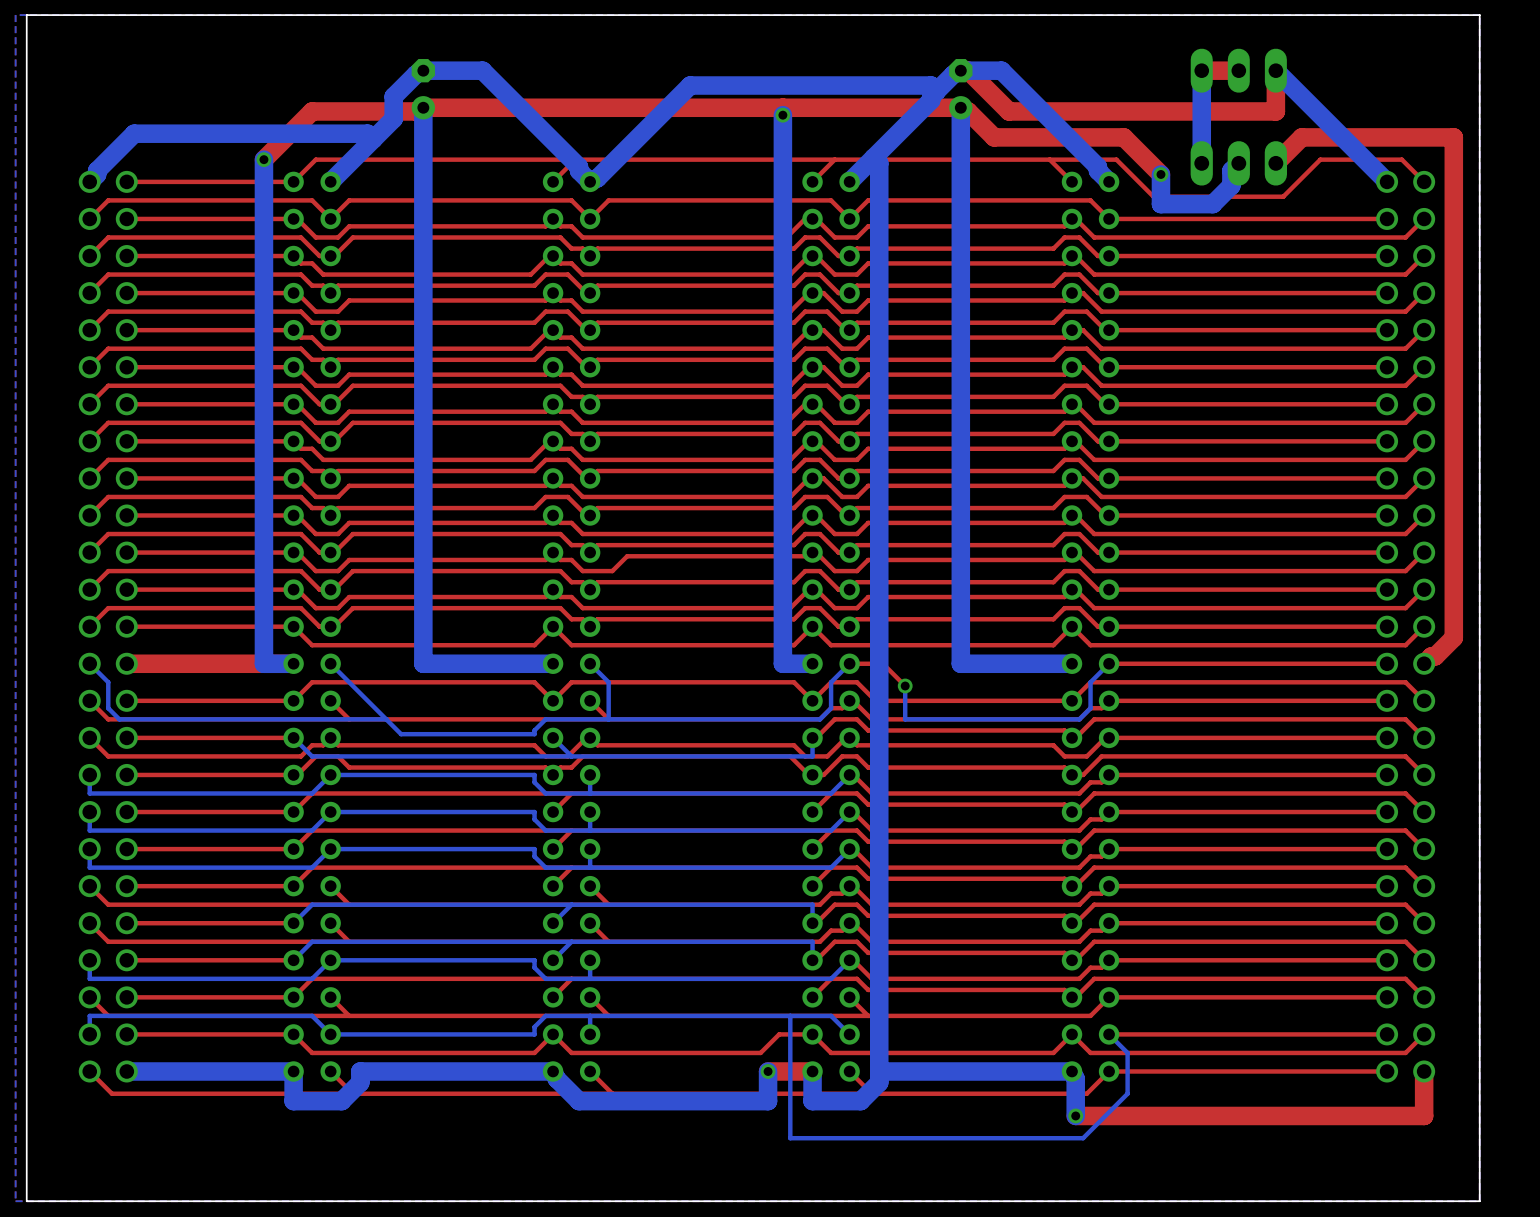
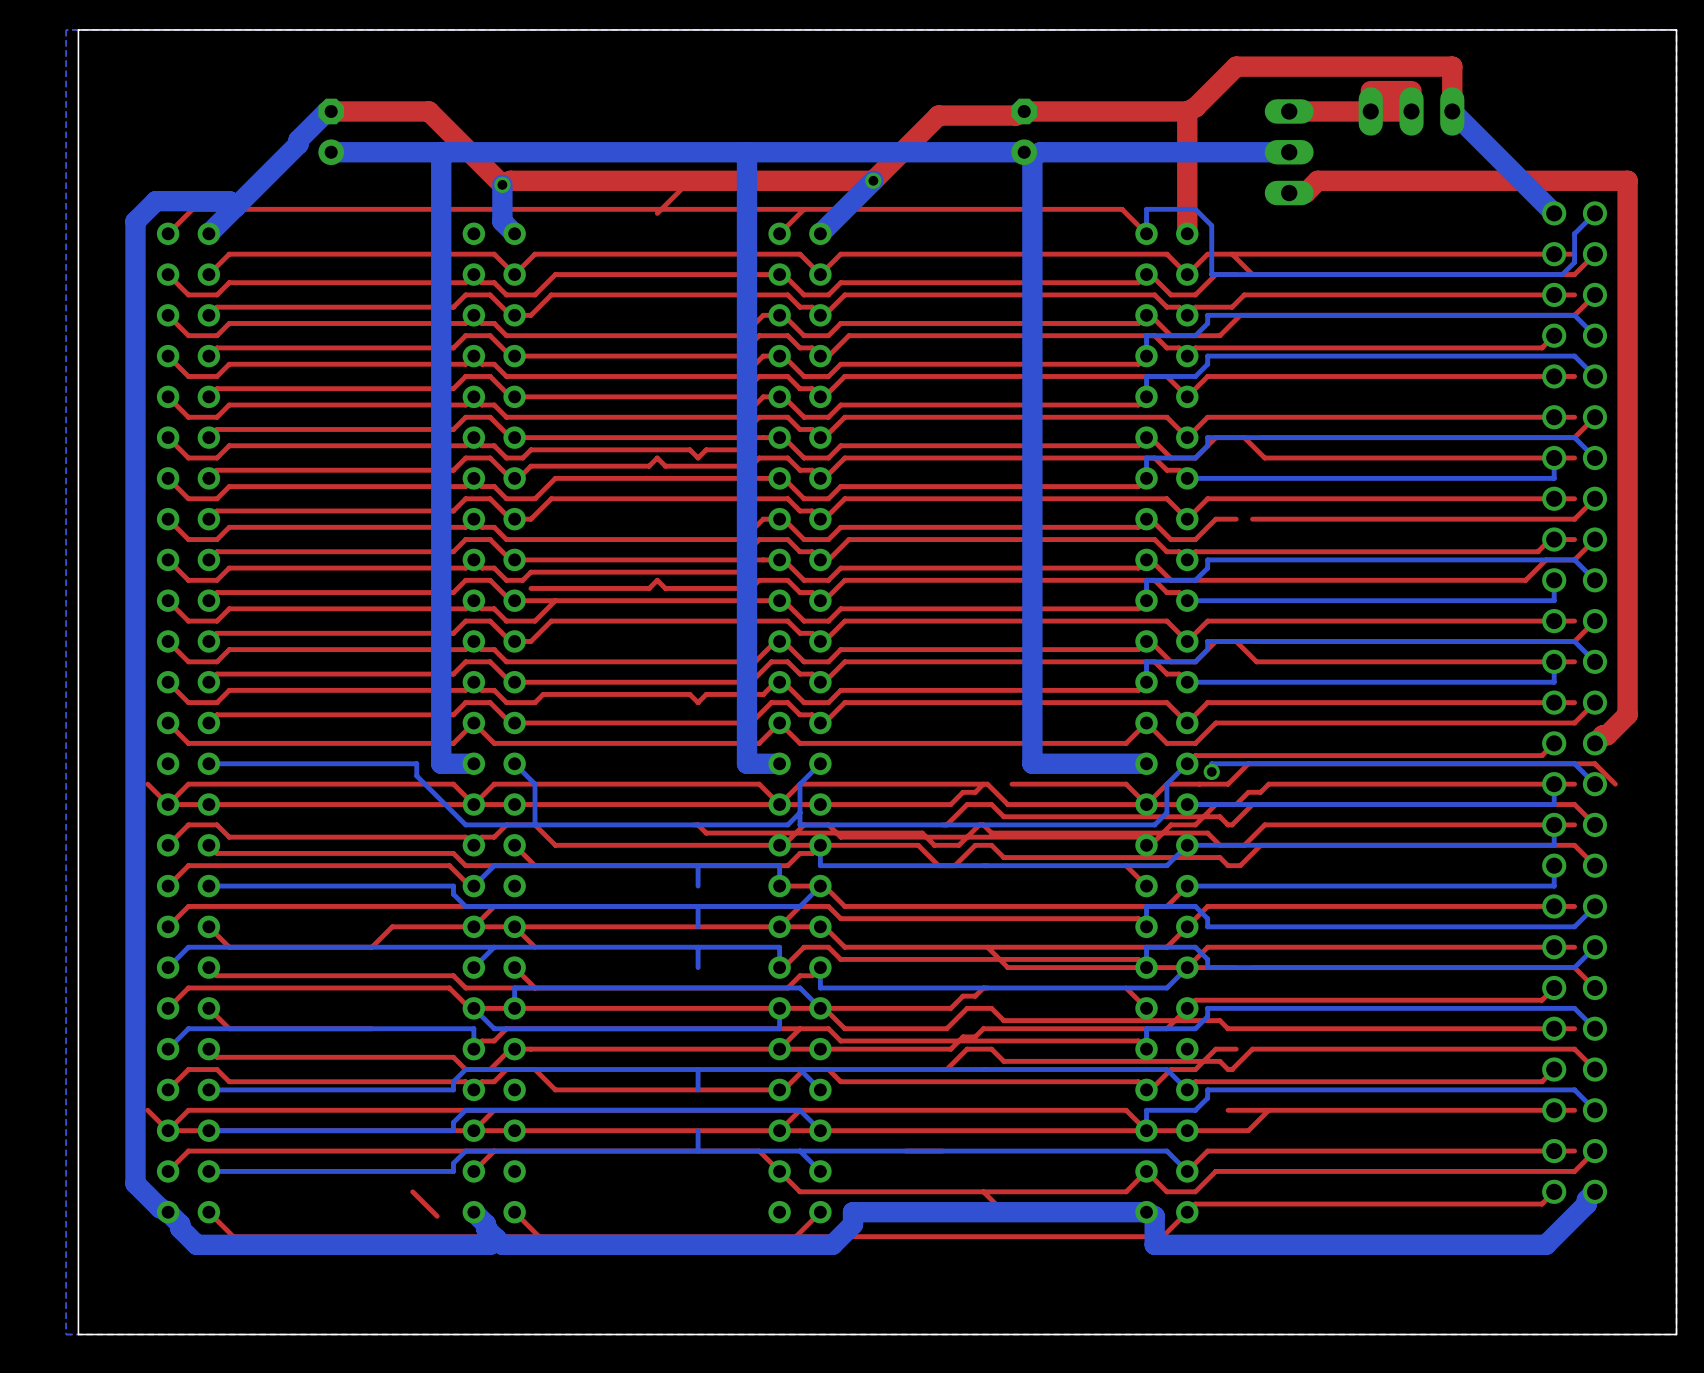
top track: (960, 70) (968, 70) (1009, 111) (1275, 111) (1275, 89) -> none
bottom track: (1201, 70) (1201, 163) -> none
part position: (1238, 70) -> (1411, 111)
top track: none -> (1452, 91) (1452, 66) (1236, 66) (1195, 107) (1187, 111)
bottom track: (1275, 70) (1387, 181) -> none
bottom track: none -> (331, 111) (327, 111) (298, 140) (298, 144) (208, 233)
part position: (423, 89) -> (331, 131)
part position: (960, 89) -> (1024, 131)
top track: none -> (1187, 111) (1024, 111) (1016, 115) (938, 115) (873, 180) (510, 180) (502, 184) (429, 111) (331, 111)
top track: none -> (1187, 111) (1187, 233)
top track: none -> (1411, 111) (1289, 111)
bottom track: none -> (1452, 111) (1554, 213)
bottom track: (936, 91) (931, 85) (690, 85) (597, 178) (590, 181) (579, 170) (579, 167) (482, 70) (423, 70) (415, 74) (393, 96) (393, 118) (330, 181) -> none
bottom track: (423, 107) (423, 663) (553, 663) -> none
bottom track: (960, 107) (960, 663) (1072, 663) -> none
bottom track: (782, 115) (782, 663) (812, 663) -> none
via position: (782, 115) -> (873, 180)
bottom track: none -> (331, 152) (1024, 152) (1032, 156)
bottom track: none -> (441, 152) (441, 763) (473, 763)
bottom track: none -> (747, 152) (747, 763) (779, 763)
bottom track: none -> (1289, 152) (1040, 152) (1032, 156)
bottom track: none -> (1032, 156) (1032, 763) (1146, 763)
bottom track: (373, 139) (367, 133) (134, 133) (97, 170) (97, 174) (89, 181) -> none
bottom track: none -> (873, 180) (820, 233)
bottom track: none -> (502, 184) (502, 221) (514, 233)
via: none -> (502, 184)
bottom track: (873, 157) (879, 163) (879, 1082) (860, 1101) (812, 1101) (812, 1071) -> none
top track: (263, 159) (312, 111) (415, 111) (423, 107) (960, 107) (968, 111) (994, 137) (1123, 137) (1160, 174) -> none
bottom track: (263, 159) (263, 663) (293, 663) -> none
via: (263, 159) -> none
top track: (834, 159) (812, 181) -> (804, 209) (779, 233)
top track: (1049, 159) (1072, 181) -> none
top track: none -> (1289, 193) (1305, 193) (1317, 180) (1627, 180) (1627, 714) (1607, 735) (1603, 735) (1594, 743)
bottom track: (1238, 163) (1231, 170) (1231, 185) (1212, 204) (1160, 204) (1160, 174) -> none
part rotation: 0° (1238, 163) -> 90° clockwise (1289, 152)
part position: (1238, 163) -> (1289, 152)
top track: (1275, 163) (1301, 137) (1453, 137) (1453, 637) (1435, 656) (1431, 656) (1424, 663) -> none
via: (1160, 174) -> none
bottom track: none -> (235, 207) (229, 201) (155, 201) (135, 221) (135, 1183) (159, 1208) (168, 1212) (180, 1224) (180, 1228) (196, 1244) (490, 1244) (496, 1238)
bottom track: (1109, 181) (1097, 170) (1097, 167) (1001, 70) (960, 70) (953, 74) (931, 96) (931, 100) (849, 181) -> none
bottom track: none -> (1594, 213) (1574, 233) (1574, 262) (1562, 274) (1211, 274) (1211, 225) (1195, 209) (1146, 209) (1146, 233)
top track: (1424, 181) (1401, 159) (1320, 159) (1283, 196) (1153, 196) (1116, 159) (315, 159) (293, 181) (126, 181) -> none
top track: none -> (1146, 233) (1122, 209) (192, 209) (168, 233)
top track: (163, 218) (126, 218) -> (229, 254) (208, 274)
top track: (297, 218) (315, 237) (338, 237) (349, 226) (545, 226) (553, 218) (560, 226) (571, 226) (582, 237) -> (376, 254) (494, 254) (514, 274) (535, 254) (800, 254) (820, 274) (840, 254) (934, 254)
top track: (805, 218) (786, 237) (667, 237) -> (1219, 274) (1215, 274) (1195, 294) (1170, 294) (1150, 274) (1146, 274) (1138, 282) (840, 282) (828, 294) (804, 294) (783, 274)
top track: (1072, 218) (1064, 226) (868, 226) (857, 237) (834, 237) (816, 218) -> (1228, 254) (1207, 254) (1187, 274) (1166, 254) (946, 254)
top track: (1109, 218) (1090, 200) (868, 200) (849, 218) (831, 200) (608, 200) (590, 218) (571, 200) (349, 200) (330, 218) (312, 200) (108, 200) (89, 218) -> (1268, 254) (1232, 254)
top track: (1424, 218) (1405, 237) (1387, 237) -> (1594, 254) (1574, 274)
top track: none -> (168, 274) (188, 294)
top track: (460, 237) (352, 237) (334, 256) (319, 256) (301, 237) (108, 237) (89, 256) -> (555, 274) (535, 294) (506, 294) (494, 282) (482, 282) (473, 274) (465, 282) (229, 282) (217, 294)
top track: (560, 237) (571, 248) (582, 248) (590, 256) (597, 248) (794, 248) (805, 237) (819, 237) (838, 256) -> (946, 294) (971, 294)
top track: none -> (689, 274) (665, 274)
top track: (1064, 237) (1053, 248) (857, 248) (849, 256) -> (1256, 294) (1244, 294) (1232, 307) (1195, 307) (1187, 315) (1179, 307) (1166, 307) (1154, 294) (983, 294)
top track: (1079, 237) (1097, 256) -> none
top track: (152, 256) (293, 256) (301, 263) (312, 263) (323, 274) (419, 274) -> (208, 315) (217, 307) (453, 307) (465, 294) (490, 294) (510, 315)
top track: (549, 256) (530, 274) (438, 274) -> (653, 294) (551, 294) (530, 315)
top track: (553, 256) (560, 263) (571, 263) (582, 274) (649, 274) -> (657, 294) (787, 294) (800, 307) (812, 307) (820, 315)
top track: (808, 256) (790, 274) (705, 274) -> (938, 294) (844, 294) (824, 315)
top track: (816, 256) (834, 274) (857, 274) (868, 263) (1064, 263) (1072, 256) (1075, 256) (1094, 274) -> (783, 315) (804, 335) (828, 335) (840, 323) (1138, 323) (1146, 315) (1150, 315) (1170, 335) (1219, 335) (1240, 315) (1252, 315)
top track: (1424, 256) (1405, 274) (1387, 274) -> (1594, 294) (1574, 315)
top track: none -> (168, 315) (188, 335)
top track: (701, 274) (667, 274) -> none
top track: (152, 293) (297, 293) (315, 311) (338, 311) (349, 300) (545, 300) (553, 293) (560, 300) (571, 300) (582, 311) -> (217, 335) (229, 323) (465, 323) (473, 315) (482, 323) (494, 323) (506, 335) (694, 335)
top track: (586, 293) (567, 274) (545, 274) (534, 285) (338, 285) (330, 293) (323, 285) (312, 285) (301, 274) (108, 274) (89, 293) -> none
top track: (808, 293) (790, 311) (708, 311) -> (938, 335) (848, 335) (828, 356)
top track: (838, 293) (819, 274) (805, 274) (794, 285) (597, 285) (590, 293) -> (763, 315) (742, 335) (698, 335)
top track: (1387, 293) (1097, 293) (1079, 274) (1064, 274) (1053, 285) (857, 285) (849, 293) -> (1554, 335) (1541, 347) (1195, 347) (1187, 356) (1179, 347) (1166, 347) (1154, 335) (983, 335)
bottom track: none -> (1594, 335) (1574, 315) (1207, 315) (1207, 323) (1195, 335) (1146, 335) (1146, 356)
top track: (1424, 293) (1405, 311) (1101, 311) (1083, 293) (1072, 293) (1064, 300) (868, 300) (857, 311) (842, 311) (823, 293) -> (971, 335) (954, 335)
top track: none -> (168, 356) (188, 376)
top track: (545, 311) (534, 322) (338, 322) (330, 330) (323, 322) (312, 322) (301, 311) (108, 311) (89, 330) -> (649, 356) (510, 356) (490, 335) (465, 335) (453, 347) (217, 347) (208, 356)
top track: (567, 311) (586, 330) -> (673, 356) (689, 356)
top track: (649, 311) (627, 311) -> (763, 356) (742, 376) (698, 376)
top track: (701, 311) (667, 311) -> (820, 356) (812, 347) (800, 347) (787, 335) (759, 335) (738, 356)
top track: none -> (1146, 356) (1138, 364) (840, 364) (828, 376) (804, 376) (783, 356)
top track: (152, 330) (293, 330) (301, 337) (312, 337) (323, 348) (419, 348) -> (208, 396) (217, 388) (453, 388) (465, 376) (490, 376) (510, 396)
top track: (549, 330) (530, 348) -> (649, 396) (632, 396)
top track: none -> (653, 376) (506, 376) (494, 364) (482, 364) (473, 356) (465, 364) (229, 364) (217, 376)
top track: (553, 330) (560, 337) (571, 337) (582, 348) -> (657, 376) (694, 376)
top track: (808, 330) (790, 348) (705, 348) -> (938, 376) (844, 376) (824, 396)
top track: (845, 330) (827, 311) (805, 311) (794, 322) (597, 322) (590, 330) -> (979, 376) (954, 376)
top track: (1072, 330) (1064, 337) (868, 337) (857, 348) (842, 348) (823, 330) -> (1228, 376) (1207, 376) (1187, 396) (1166, 376) (983, 376)
top track: (1105, 330) (1086, 311) (1064, 311) (1053, 322) (857, 322) (849, 330) -> (1264, 376) (1240, 376)
bottom track: none -> (1594, 376) (1574, 356) (1207, 356) (1207, 364) (1195, 376) (1146, 376) (1146, 396)
top track: (1424, 330) (1405, 348) (1101, 348) (1083, 330) -> none
top track: none -> (168, 396) (188, 417)
top track: (545, 348) (534, 359) (338, 359) (330, 367) (323, 359) (312, 359) (301, 348) (108, 348) (89, 367) -> none
top track: (567, 348) (586, 367) -> (673, 396) (689, 396)
top track: (649, 348) (627, 348) -> (763, 396) (742, 417) (698, 417)
top track: (701, 348) (667, 348) -> (820, 396) (812, 388) (800, 388) (787, 376) (759, 376) (738, 396)
top track: none -> (1146, 396) (1138, 405) (840, 405) (828, 417) (804, 417) (783, 396)
top track: (152, 367) (297, 367) (315, 385) (338, 385) (349, 374) (545, 374) (553, 367) (560, 374) (571, 374) (582, 385) -> (217, 417) (229, 405) (465, 405) (473, 396) (482, 405) (494, 405) (506, 417) (694, 417)
top track: (808, 367) (790, 385) (705, 385) -> (938, 417) (844, 417) (824, 437)
top track: (845, 367) (827, 348) (805, 348) (794, 359) (597, 359) (590, 367) -> (979, 417) (954, 417)
top track: (1072, 367) (1064, 374) (868, 374) (857, 385) (842, 385) (823, 367) -> (1228, 417) (1207, 417) (1187, 437) (1166, 417) (983, 417)
top track: (1083, 367) (1101, 385) -> (1240, 417) (1264, 417)
top track: (1105, 367) (1086, 348) (1064, 348) (1053, 359) (857, 359) (849, 367) -> none
top track: (1424, 367) (1405, 385) (1387, 385) -> (1594, 417) (1574, 437)
top track: none -> (168, 437) (188, 458)
top track: (419, 385) (352, 385) (334, 404) (319, 404) (301, 385) (108, 385) (89, 404) -> (510, 437) (490, 417) (465, 417) (453, 429) (217, 429) (208, 437)
top track: (560, 385) (571, 396) -> (665, 437) (689, 437)
top track: (701, 385) (667, 385) -> (820, 437) (812, 429) (800, 429) (787, 417) (759, 417) (738, 437)
top track: (1064, 385) (1053, 396) (857, 396) (849, 404) -> (1187, 478) (1179, 470) (1166, 470) (1154, 458) (983, 458)
top track: none -> (1219, 437) (1215, 437) (1195, 458) (1170, 458) (1150, 437) (1146, 437) (1138, 445) (840, 445) (828, 458) (804, 458) (783, 437)
top track: (638, 396) (794, 396) (805, 385) (827, 385) (845, 404) -> (946, 458) (979, 458)
top track: (152, 404) (297, 404) (315, 422) (338, 422) (349, 411) (438, 411) -> (217, 458) (229, 445) (465, 445) (473, 437) (482, 445) (494, 445) (506, 458) (522, 458) (530, 449) (677, 449)
top track: (805, 404) (786, 422) (705, 422) -> (934, 458) (844, 458) (824, 478)
bottom track: none -> (1554, 458) (1554, 478) (1187, 478)
bottom track: none -> (1594, 458) (1574, 437) (1207, 437) (1207, 445) (1195, 458) (1146, 458) (1146, 478)
top track: (1424, 404) (1405, 422) (1094, 422) (1075, 404) (1072, 404) (1064, 411) (868, 411) (857, 422) (834, 422) (816, 404) -> none
top track: (571, 411) (582, 422) -> (665, 478) (689, 478)
top track: (419, 422) (352, 422) (334, 441) (319, 441) (301, 422) (108, 422) (89, 441) -> (510, 478) (490, 458) (465, 458) (453, 470) (217, 470) (208, 478)
top track: (460, 422) (427, 422) -> (530, 466) (518, 478)
top track: none -> (555, 478) (535, 498) (506, 498) (494, 486) (482, 486) (473, 478) (465, 486) (229, 486) (217, 498)
top track: (560, 422) (571, 433) (582, 433) (590, 441) (597, 433) (794, 433) (805, 422) (819, 422) (838, 441) -> none
top track: (701, 422) (667, 422) -> (820, 478) (812, 470) (800, 470) (787, 458) (759, 458) (751, 466) (677, 466)
top track: none -> (1146, 478) (1138, 486) (840, 486) (828, 498) (804, 498) (783, 478)
top track: (152, 441) (293, 441) (301, 448) (312, 448) (323, 459) (419, 459) -> (208, 519) (217, 511) (453, 511) (465, 498) (490, 498) (510, 519)
top track: (549, 441) (530, 459) (438, 459) -> (653, 498) (551, 498) (530, 519)
top track: (553, 441) (560, 448) (571, 448) (582, 459) (649, 459) -> (657, 498) (787, 498) (800, 511) (812, 511) (820, 519)
top track: (808, 441) (790, 459) (705, 459) -> (938, 498) (844, 498) (824, 519)
top track: (1072, 441) (1064, 448) (868, 448) (857, 459) (834, 459) (816, 441) -> (971, 498) (946, 498)
top track: (1075, 441) (1094, 459) -> (1232, 498) (1256, 498)
top track: (1097, 441) (1079, 422) (1064, 422) (1053, 433) (857, 433) (849, 441) -> (1228, 498) (1207, 498) (1187, 519) (1166, 498) (983, 498)
top track: (1424, 441) (1405, 459) (1387, 459) -> (1594, 498) (1574, 519)
top track: none -> (168, 519) (188, 539)
top track: (701, 459) (667, 459) -> none
top track: (1064, 459) (1053, 471) (857, 471) (849, 478) -> (1219, 519) (1215, 519) (1195, 539) (1170, 539) (1150, 519) (1146, 519) (1138, 527) (840, 527) (828, 539) (804, 539) (783, 519)
top track: (1079, 459) (1097, 478) (1364, 478) -> (983, 539) (1154, 539) (1166, 551) (1179, 551) (1187, 559) (1195, 551) (1537, 551) (1550, 539)
top track: (152, 478) (297, 478) (315, 496) (338, 496) (349, 485) (545, 485) (553, 478) (560, 485) (571, 485) (582, 496) -> (217, 539) (229, 527) (465, 527) (473, 519) (482, 527) (494, 527) (506, 539) (694, 539)
top track: (586, 478) (567, 459) (545, 459) (534, 471) (338, 471) (330, 478) (323, 471) (312, 471) (301, 459) (108, 459) (89, 478) -> none
top track: (808, 478) (790, 496) (708, 496) -> (938, 539) (848, 539) (828, 559)
top track: (823, 478) (842, 496) (857, 496) (868, 485) (1064, 485) (1072, 478) (1083, 478) (1101, 496) (1361, 496) -> (954, 539) (971, 539)
top track: (838, 478) (819, 459) (805, 459) (794, 471) (597, 471) (590, 478) -> (763, 519) (742, 539) (698, 539)
top track: (1424, 478) (1405, 496) (1387, 496) -> (1594, 539) (1574, 559)
top track: none -> (168, 559) (188, 580)
top track: (545, 496) (534, 508) -> (706, 572) (636, 572)
top track: none -> (649, 559) (510, 559) (490, 539) (465, 539) (453, 551) (217, 551) (208, 559)
top track: (567, 496) (586, 515) (590, 515) (597, 508) -> (673, 559) (689, 559)
top track: (701, 496) (667, 496) -> (820, 559) (812, 551) (800, 551) (787, 539) (759, 539) (738, 559)
top track: (438, 508) (338, 508) (330, 515) (323, 508) (312, 508) (301, 496) (108, 496) (89, 515) -> none
top track: (638, 508) (794, 508) (805, 496) (827, 496) (845, 515) -> (946, 580) (979, 580)
top track: (152, 515) (297, 515) (315, 534) (338, 534) (349, 522) (438, 522) -> (217, 580) (229, 568) (465, 568) (473, 559) (482, 568) (494, 568) (506, 580) (522, 580) (530, 572)
top track: (808, 515) (790, 534) (705, 534) -> (938, 580) (844, 580) (824, 600)
top track: (1072, 515) (1064, 522) (868, 522) (857, 534) (834, 534) (816, 515) -> (1228, 580) (1170, 580) (1150, 559) (1146, 559) (1138, 568) (840, 568) (828, 580) (804, 580) (783, 559)
top track: (1105, 515) (1086, 496) (1064, 496) (1053, 508) (857, 508) (849, 515) -> (1187, 600) (1179, 592) (1166, 592) (1154, 580) (983, 580)
bottom track: none -> (1554, 580) (1554, 600) (1187, 600)
top track: (1387, 515) (1342, 515) -> (1546, 559) (1525, 580)
bottom track: none -> (1594, 580) (1574, 559) (1207, 559) (1207, 568) (1195, 580) (1146, 580) (1146, 600)
top track: (1424, 515) (1405, 534) (1094, 534) (1075, 515) -> (1264, 580) (1232, 580)
top track: (571, 522) (582, 534) -> (665, 600) (689, 600)
top track: none -> (168, 600) (188, 621)
top track: (419, 534) (352, 534) (334, 552) (319, 552) (301, 534) (108, 534) (89, 552) -> (510, 600) (490, 580) (465, 580) (453, 592) (217, 592) (208, 600)
top track: (560, 534) (571, 545) (582, 545) (590, 552) (597, 545) (794, 545) (805, 534) (819, 534) (838, 552) -> none
top track: (701, 534) (667, 534) -> (820, 600) (812, 592) (800, 592) (787, 580) (759, 580) (751, 588) (677, 588)
top track: none -> (1146, 600) (1138, 608) (840, 608) (828, 621) (804, 621) (783, 600)
top track: (812, 552) (819, 556) (627, 556) (612, 571) (582, 571) (571, 559) (560, 559) (553, 552) (545, 559) (349, 559) (338, 571) (315, 571) (297, 552) (152, 552) -> (555, 600) (535, 621) (506, 621) (494, 608) (482, 608) (473, 600) (465, 608) (229, 608) (217, 621)
top track: (1072, 552) (1064, 559) (868, 559) (857, 571) (834, 571) (816, 552) -> (971, 621) (946, 621)
top track: (1075, 552) (1094, 571) -> (1232, 621) (1256, 621)
top track: (1097, 552) (1079, 534) (1064, 534) (1053, 545) (857, 545) (849, 552) -> (1228, 621) (1207, 621) (1187, 641) (1166, 621) (983, 621)
top track: (1424, 552) (1405, 571) (1387, 571) -> (1594, 621) (1574, 641)
top track: none -> (168, 641) (188, 661)
top track: (419, 571) (352, 571) (334, 589) (319, 589) (301, 571) (108, 571) (89, 589) -> (510, 641) (490, 621) (465, 621) (453, 633) (217, 633) (208, 641)
top track: (438, 571) (560, 571) (571, 582) (582, 582) (590, 589) (597, 582) (794, 582) (805, 571) (819, 571) (838, 589) -> (530, 641) (551, 621) (787, 621) (800, 633) (812, 633) (820, 641) (824, 641) (844, 621) (942, 621)
top track: (1064, 571) (1053, 582) (857, 582) (849, 589) -> (1187, 682) (1179, 674) (1166, 674) (1154, 661) (983, 661)
top track: (152, 589) (297, 589) (315, 608) (338, 608) (349, 597) (545, 597) (553, 589) (560, 597) (571, 597) (582, 608) -> (217, 661) (229, 649) (465, 649) (473, 641) (482, 649) (494, 649) (506, 661) (755, 661) (775, 641) (783, 641) (804, 661) (828, 661) (840, 649) (1138, 649) (1146, 641) (1150, 641) (1170, 661) (1195, 661) (1215, 641) (1219, 641)
top track: (808, 589) (790, 608) (705, 608) -> (938, 661) (844, 661) (824, 682)
bottom track: none -> (1554, 661) (1554, 682) (1187, 682)
bottom track: none -> (1594, 661) (1574, 641) (1207, 641) (1207, 649) (1195, 661) (1146, 661) (1146, 682)
top track: (1424, 589) (1405, 608) (1094, 608) (1075, 589) (1072, 589) (1064, 597) (868, 597) (857, 608) (834, 608) (816, 589) -> (971, 661) (946, 661)
top track: (419, 608) (352, 608) (334, 626) (319, 626) (301, 608) (108, 608) (89, 626) -> (510, 682) (490, 661) (465, 661) (453, 674) (217, 674) (208, 682)
top track: (560, 608) (571, 619) -> (665, 682) (689, 682)
top track: (660, 608) (638, 608) -> (775, 682) (763, 694)
top track: (701, 608) (667, 608) -> (820, 682) (812, 674) (800, 674) (787, 661) (771, 661) (751, 682)
top track: none -> (1146, 682) (1138, 690) (840, 690) (828, 702) (804, 702) (783, 682)
top track: none -> (677, 694) (543, 694) (535, 702) (506, 702) (494, 690) (482, 690) (473, 682) (465, 690) (229, 690) (217, 702)
top track: (649, 619) (794, 619) (805, 608) (819, 608) (838, 626) -> (824, 723) (844, 702) (971, 702)
part: (108, 626) -> none
top track: (152, 626) (293, 626) (312, 645) (419, 645) -> (208, 723) (217, 714) (453, 714) (465, 702) (490, 702) (510, 723)
part: (312, 626) -> none
part: (571, 626) -> none
part: (831, 626) -> none
part position: (1090, 626) -> (1166, 723)
top track: (1097, 626) (1079, 608) (1064, 608) (1053, 619) (857, 619) (849, 626) -> (1256, 702) (1207, 702) (1187, 723) (1166, 702) (983, 702)
part position: (1405, 626) -> (1574, 702)
top track: (1424, 626) (1405, 645) (1387, 645) -> (1594, 702) (1574, 723)
part: none -> (188, 723)
part: none -> (494, 723)
top track: (571, 645) (553, 626) (534, 645) -> (677, 723) (636, 723)
part: none -> (800, 723)
top track: (701, 645) (638, 645) -> (820, 723) (812, 714) (800, 714) (787, 702) (771, 702) (751, 723)
top track: (1090, 645) (1072, 626) (1053, 645) (831, 645) (812, 626) (794, 645) (705, 645) -> (1248, 723) (1215, 723) (1195, 743) (1166, 743) (1146, 723) (1126, 743) (1020, 743)
bottom track: (89, 663) (108, 682) (108, 708) (119, 719) (386, 719) -> none
top track width: thick (293, 663) (126, 663) -> thin (371, 743) (188, 743)
bottom track: (590, 663) (608, 682) (608, 719) -> (514, 763) (535, 784) (535, 824)
top track: none -> (983, 743) (800, 743) (779, 723) (759, 743) (494, 743) (473, 723) (453, 743) (371, 743)
bottom track: (849, 663) (831, 682) (831, 708) (819, 719) (545, 719) (534, 730) (534, 734) (401, 734) (330, 663) -> none
top track: (882, 663) (905, 686) -> none
bottom track: (1109, 663) (1090, 682) (1090, 708) (1079, 719) -> (1554, 784) (1554, 804) (1236, 804)
top track: none -> (1554, 743) (1541, 755) (1195, 755) (1187, 763)
top track: (1387, 663) (1109, 663) -> none
bottom track: none -> (208, 763) (416, 763) (416, 775) (465, 824) (787, 824) (800, 812)
bottom track: none -> (1187, 763) (1166, 784) (1166, 812) (1154, 824) (800, 824) (800, 784) (820, 763)
bottom track: (905, 686) (905, 719) (1034, 719) -> none
via: (905, 686) -> none
bottom track: none -> (1211, 771) (1211, 763) (1574, 763) (1594, 784)
via: none -> (1211, 771)
top track: none -> (188, 784) (168, 804)
top track: (330, 700) (349, 719) -> (168, 478) (188, 498)
top track: (590, 700) (608, 719) -> (514, 845) (535, 865)
top track: (875, 700) (857, 682) (831, 682) (812, 700) (794, 682) (571, 682) (553, 700) (534, 682) (312, 682) (293, 700) -> (983, 784) (800, 784) (779, 804) (759, 784) (494, 784) (473, 804) (453, 784) (371, 784)
top track: (1016, 700) (979, 700) -> (1166, 784) (1146, 804) (1126, 784)
top track: none -> (1215, 804) (1195, 824) (1170, 824) (1150, 845) (1146, 845) (1138, 837) (840, 837) (828, 824) (804, 824) (783, 845)
top track: (1387, 719) (1405, 719) (1424, 737) -> (1574, 804) (1594, 824)
top track: (89, 737) (108, 756) (301, 756) (312, 745) (323, 745) (330, 737) (338, 745) (534, 745) (545, 756) -> (217, 824) (229, 837) (465, 837) (473, 845) (482, 837) (494, 837) (506, 824) (535, 824) (555, 845) (649, 845)
top track: none -> (188, 824) (168, 845)
top track: (293, 737) (152, 737) -> none
bottom track: (553, 737) (571, 756) -> (800, 1069) (820, 1089)
top track: (586, 737) (567, 756) -> (689, 845) (673, 845)
bottom track: (812, 737) (812, 756) (312, 756) (293, 737) -> none
bottom track: none -> (1554, 824) (1554, 845) (1187, 845) (1166, 865) (820, 865) (820, 845)
top track: (582, 756) (571, 767) (560, 767) (553, 774) (545, 767) (349, 767) (338, 756) (315, 756) (297, 774) -> none
top track: none -> (820, 845) (812, 853) (800, 853) (787, 865) (465, 865) (453, 853) (217, 853) (208, 845)
top track: (1387, 756) (1405, 756) (1424, 774) -> (1574, 845) (1594, 865)
bottom track: (89, 774) (89, 793) (145, 793) -> none
top track: none -> (188, 865) (168, 886)
bottom track: (404, 774) (330, 774) (312, 793) -> (465, 906) (453, 894) (453, 886) (392, 886)
bottom track: (849, 774) (831, 793) (545, 793) (534, 782) (534, 774) -> (779, 886) (779, 865) (636, 865)
top track: none -> (1126, 865) (1146, 886)
bottom track: none -> (1554, 865) (1554, 886) (1187, 886)
top track: (1387, 774) (1109, 774) (1101, 782) (1090, 782) (1079, 793) (871, 793) (853, 774) -> none
top track: (382, 793) (312, 793) (293, 812) -> (469, 886) (449, 865) (376, 865)
top track: (571, 793) (553, 812) -> (494, 906) (473, 926)
top track: (664, 793) (386, 793) -> none
top track: (705, 793) (857, 793) (868, 804) (1064, 804) (1072, 812) -> (987, 947) (1166, 947) (1207, 906) (1228, 906)
top track: (831, 793) (812, 812) -> (800, 906) (779, 926)
top track: none -> (188, 906) (168, 926)
top track: none -> (371, 906) (828, 906) (840, 918) (1138, 918) (1146, 926)
bottom track: (378, 812) (330, 812) (312, 830) (89, 830) (89, 812) -> none
bottom track: (849, 812) (831, 830) (545, 830) (534, 819) (534, 812) -> (820, 886) (800, 906) (636, 906)
top track: (1109, 812) (1101, 819) (1090, 819) (1079, 830) (871, 830) (853, 812) -> (1187, 886) (1166, 906) (987, 906)
bottom track: none -> (1594, 906) (1574, 926) (1207, 926) (1207, 918) (1195, 906) (1146, 906) (1146, 926)
top track: (1424, 812) (1405, 793) (1094, 793) (1075, 812) -> (1268, 906) (1232, 906)
top track: (571, 830) (553, 849) -> (800, 1028) (779, 1049)
top track: (705, 830) (857, 830) (868, 841) (1064, 841) (1072, 849) -> (824, 926) (844, 947) (983, 947)
top track: (831, 830) (812, 849) -> none
top track: (163, 849) (126, 849) -> (229, 947) (208, 926)
bottom track: (330, 849) (312, 867) (89, 867) (89, 849) -> (412, 947) (188, 947) (168, 967)
bottom track: (849, 849) (831, 867) (545, 867) (534, 856) (534, 849) -> (779, 967) (779, 947) (636, 947)
top track: none -> (1228, 947) (1207, 947) (1187, 967)
top track: (1109, 849) (1101, 856) (1090, 856) (1079, 867) -> (1268, 947) (1232, 947)
bottom track: none -> (1594, 947) (1574, 967) (1207, 967) (1207, 959) (1195, 947) (1146, 947) (1146, 967)
top track: (1424, 849) (1405, 830) (1094, 830) (1075, 849) -> none
top track: (571, 867) (553, 886) -> (494, 1151) (473, 1171)
top track: (664, 867) (312, 867) (293, 886) -> none
top track: none -> (820, 967) (812, 975) (800, 975) (787, 987) (465, 987) (453, 975) (217, 975) (208, 967)
top track: (831, 867) (812, 886) -> none
bottom track: none -> (1187, 967) (1166, 987) (820, 987) (820, 967)
top track: (1094, 867) (1075, 886) (1072, 886) (1064, 878) (868, 878) (857, 867) (667, 867) -> (1146, 967) (1138, 959) (840, 959) (828, 947) (804, 947) (783, 967)
top track: (1387, 867) (1405, 867) (1424, 886) -> (1574, 967) (1594, 987)
top track: (89, 886) (108, 904) (382, 904) -> (371, 987) (449, 987) (469, 1008)
top track: none -> (188, 987) (168, 1008)
top track: (330, 886) (349, 904) -> (168, 682) (188, 702)
top track: (590, 886) (608, 904) -> (514, 926) (535, 947)
top track: none -> (1554, 987) (1541, 1000) (1195, 1000) (1166, 1028) (987, 1028)
top track: (1387, 886) (1109, 886) (1101, 893) (1090, 893) (1079, 904) (871, 904) (853, 886) -> none
bottom track: (571, 904) (553, 923) -> (494, 947) (473, 967)
bottom track: none -> (779, 1008) (779, 1028) (494, 1028) (473, 1008)
bottom track: none -> (820, 1008) (800, 987) (514, 987) (514, 1008)
top track: none -> (824, 1008) (844, 1028) (942, 1028)
top track: (89, 923) (108, 941) (419, 941) -> (208, 1049) (217, 1057) (453, 1057) (465, 1069) (490, 1069) (510, 1049)
top track: (163, 923) (126, 923) -> (229, 1028) (208, 1008)
top track: (330, 923) (349, 941) -> (168, 723) (188, 743)
top track: (590, 923) (608, 941) -> (514, 967) (535, 987)
bottom track: (812, 923) (812, 904) (312, 904) (293, 923) -> none
top track: (853, 923) (871, 941) (1060, 941) -> (1150, 1089) (1170, 1069) (1195, 1069) (1215, 1049)
top track: (1109, 923) (1101, 930) (1090, 930) (1079, 941) -> (1268, 1028) (1232, 1028)
bottom track: none -> (1594, 1028) (1574, 1008) (1207, 1008) (1207, 1016) (1195, 1028) (1146, 1028) (1146, 1049)
top track: (1424, 923) (1405, 904) (1094, 904) (1075, 923) -> none
bottom track: none -> (473, 1049) (473, 1028) (188, 1028) (168, 1049)
bottom track: (571, 941) (553, 960) -> (494, 865) (473, 886)
top track: none -> (1146, 1049) (1138, 1040) (840, 1040) (828, 1028) (506, 1028) (494, 1040) (482, 1040) (473, 1049)
top track: (1387, 941) (1405, 941) (1424, 960) -> (1574, 1049) (1594, 1069)
bottom track: (89, 960) (89, 978) (145, 978) -> none
top track: none -> (188, 1069) (168, 1089)
top track: (293, 960) (152, 960) -> none
bottom track: (378, 960) (330, 960) (312, 978) -> (465, 1069) (453, 1081) (453, 1089) (392, 1089)
bottom track: (812, 960) (812, 941) (312, 941) (293, 960) -> none
bottom track: (849, 960) (831, 978) (545, 978) (534, 967) (534, 960) -> (1187, 1089) (1166, 1069) (636, 1069)
top track: (853, 960) (871, 978) (997, 978) -> (824, 886) (844, 906) (983, 906)
top track: none -> (1554, 1069) (1541, 1081) (1195, 1081) (1187, 1089)
top track: (1387, 960) (1109, 960) (1101, 967) (1090, 967) (1079, 978) (1001, 978) -> none
top track: (460, 978) (312, 978) (293, 997) -> (555, 1089) (535, 1069) (506, 1069) (494, 1081) (482, 1081) (473, 1089) (465, 1081) (229, 1081) (217, 1069)
top track: (571, 978) (553, 997) -> (494, 1110) (473, 1130)
top track: (667, 978) (857, 978) (868, 989) (1064, 989) (1072, 997) -> (783, 1089) (804, 1069) (828, 1069) (840, 1081) (1138, 1081) (1146, 1089)
top track: (831, 978) (812, 997) -> (800, 1110) (779, 1130)
top track: none -> (188, 1110) (168, 1130)
top track: none -> (371, 1110) (1126, 1110) (1146, 1130)
top track: (330, 997) (349, 1015) -> none
top track: (590, 997) (608, 1015) -> none
top track: (849, 997) (868, 1015) -> (1126, 987) (1146, 1008)
bottom track: none -> (1594, 1110) (1574, 1089) (1207, 1089) (1207, 1098) (1195, 1110) (1146, 1110) (1146, 1130)
top track: (1424, 997) (1405, 978) (1094, 978) (1075, 997) -> (1268, 1110) (1232, 1110)
bottom track: (145, 1015) (89, 1015) (89, 1034) -> none
bottom track: (312, 1015) (330, 1034) (378, 1034) -> (208, 1171) (453, 1171) (453, 1163) (465, 1151)
bottom track: none -> (820, 1130) (800, 1110) (465, 1110) (453, 1122) (453, 1130) (392, 1130)
bottom track: (790, 1015) (790, 1138) (1083, 1138) (1127, 1093) (1127, 1052) (1109, 1034) -> none
top track: none -> (188, 1151) (168, 1171)
bottom track: none -> (800, 1151) (820, 1171)
top track: (779, 1034) (760, 1052) (571, 1052) (553, 1034) (534, 1052) (312, 1052) (293, 1034) -> (893, 1191) (800, 1191) (759, 1151) (371, 1151)
top track: (812, 1034) (831, 1052) (1053, 1052) (1072, 1034) (1090, 1052) -> (942, 1191) (1126, 1191) (1146, 1171) (1166, 1191) (1195, 1191) (1215, 1171) (1248, 1171)
bottom track: (849, 1034) (831, 1015) (545, 1015) (534, 1027) (534, 1034) -> (1187, 1171) (1166, 1151) (636, 1151)
top track: none -> (1268, 1151) (1207, 1151) (1187, 1171)
top track: (1424, 1034) (1405, 1052) (1387, 1052) -> (1594, 1151) (1574, 1171)
top track: (590, 1071) (612, 1093) -> (514, 1212) (539, 1236)
bottom track: (768, 1071) (768, 1101) (579, 1101) (556, 1078) (553, 1071) (360, 1071) (360, 1082) (341, 1101) (293, 1101) (293, 1071) (126, 1071) -> none
via: (768, 1071) -> none
top track width: thick (812, 1071) (768, 1071) -> thin (942, 1191) (893, 1191)
bottom track: (879, 1071) (1072, 1071) (1075, 1078) (1075, 1115) -> none
top track: none -> (1554, 1191) (1541, 1204) (1195, 1204) (1162, 1236) (233, 1236) (208, 1212)
top track: (1387, 1071) (1109, 1071) (1086, 1093) (111, 1093) (89, 1071) -> none
bottom track: none -> (1594, 1191) (1586, 1199) (1586, 1204) (1546, 1244) (1154, 1244) (1154, 1216) (1146, 1212) (853, 1212) (853, 1224) (832, 1244) (502, 1244) (486, 1228) (486, 1224) (473, 1212)
top track: (1424, 1071) (1424, 1115) (1075, 1115) -> none
top track: none -> (820, 1212) (795, 1236)
via: (1075, 1115) -> none

